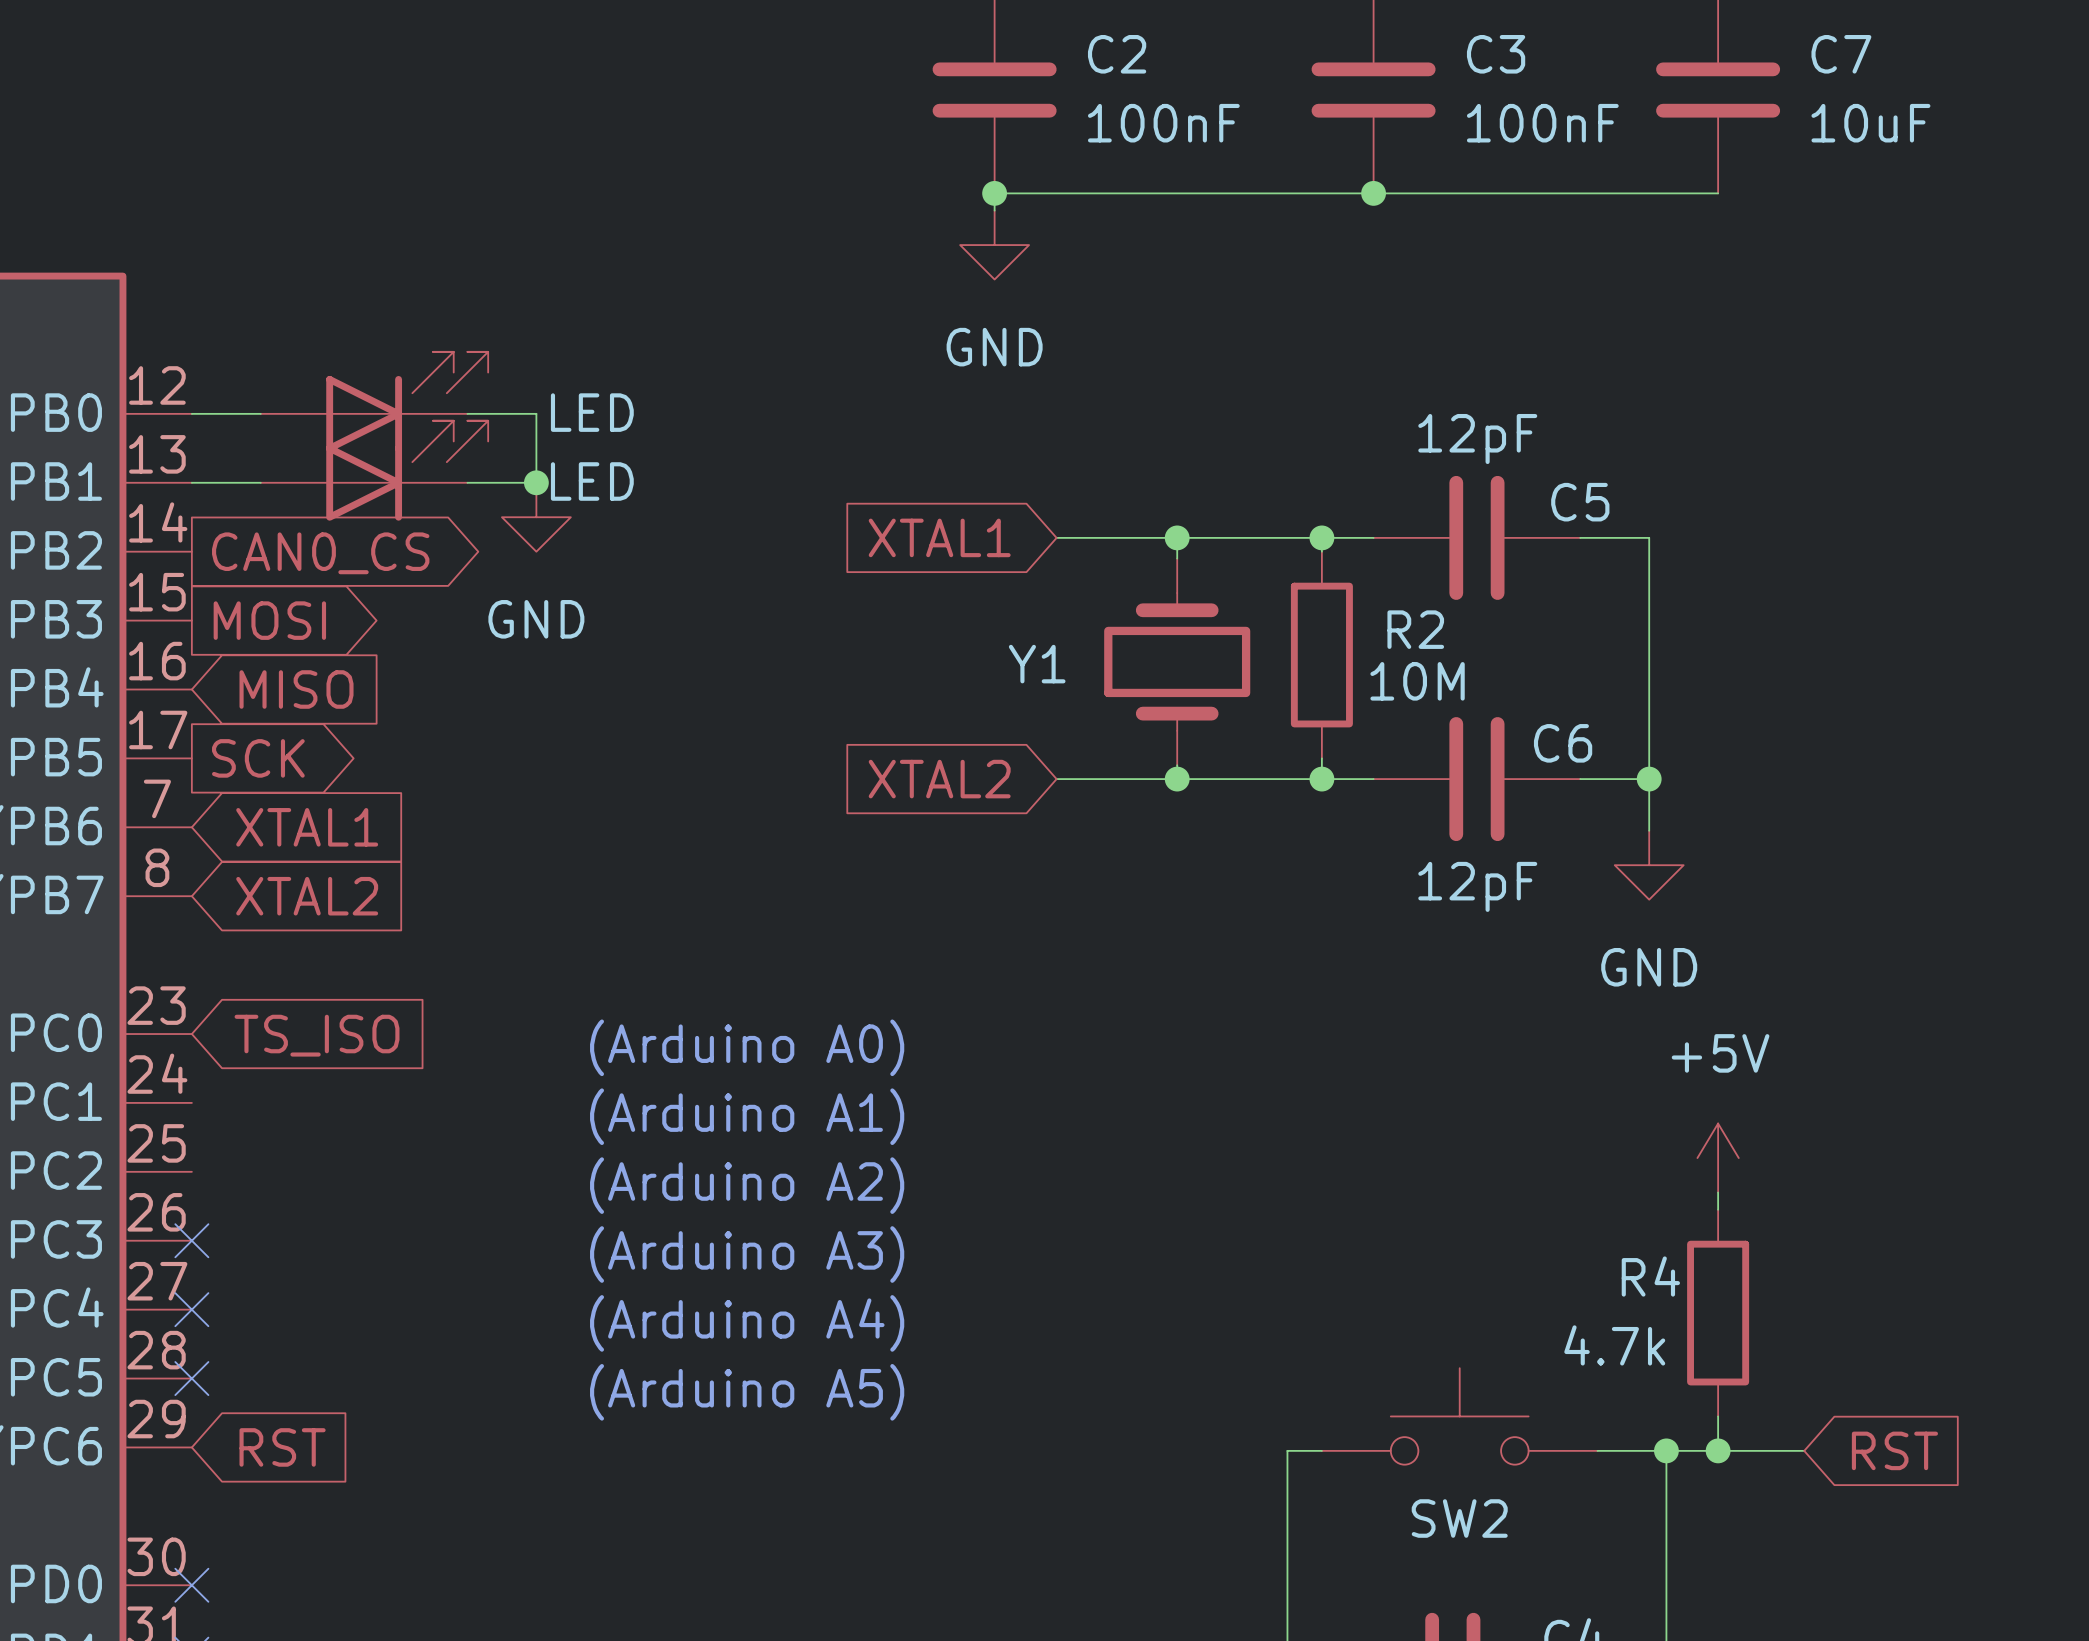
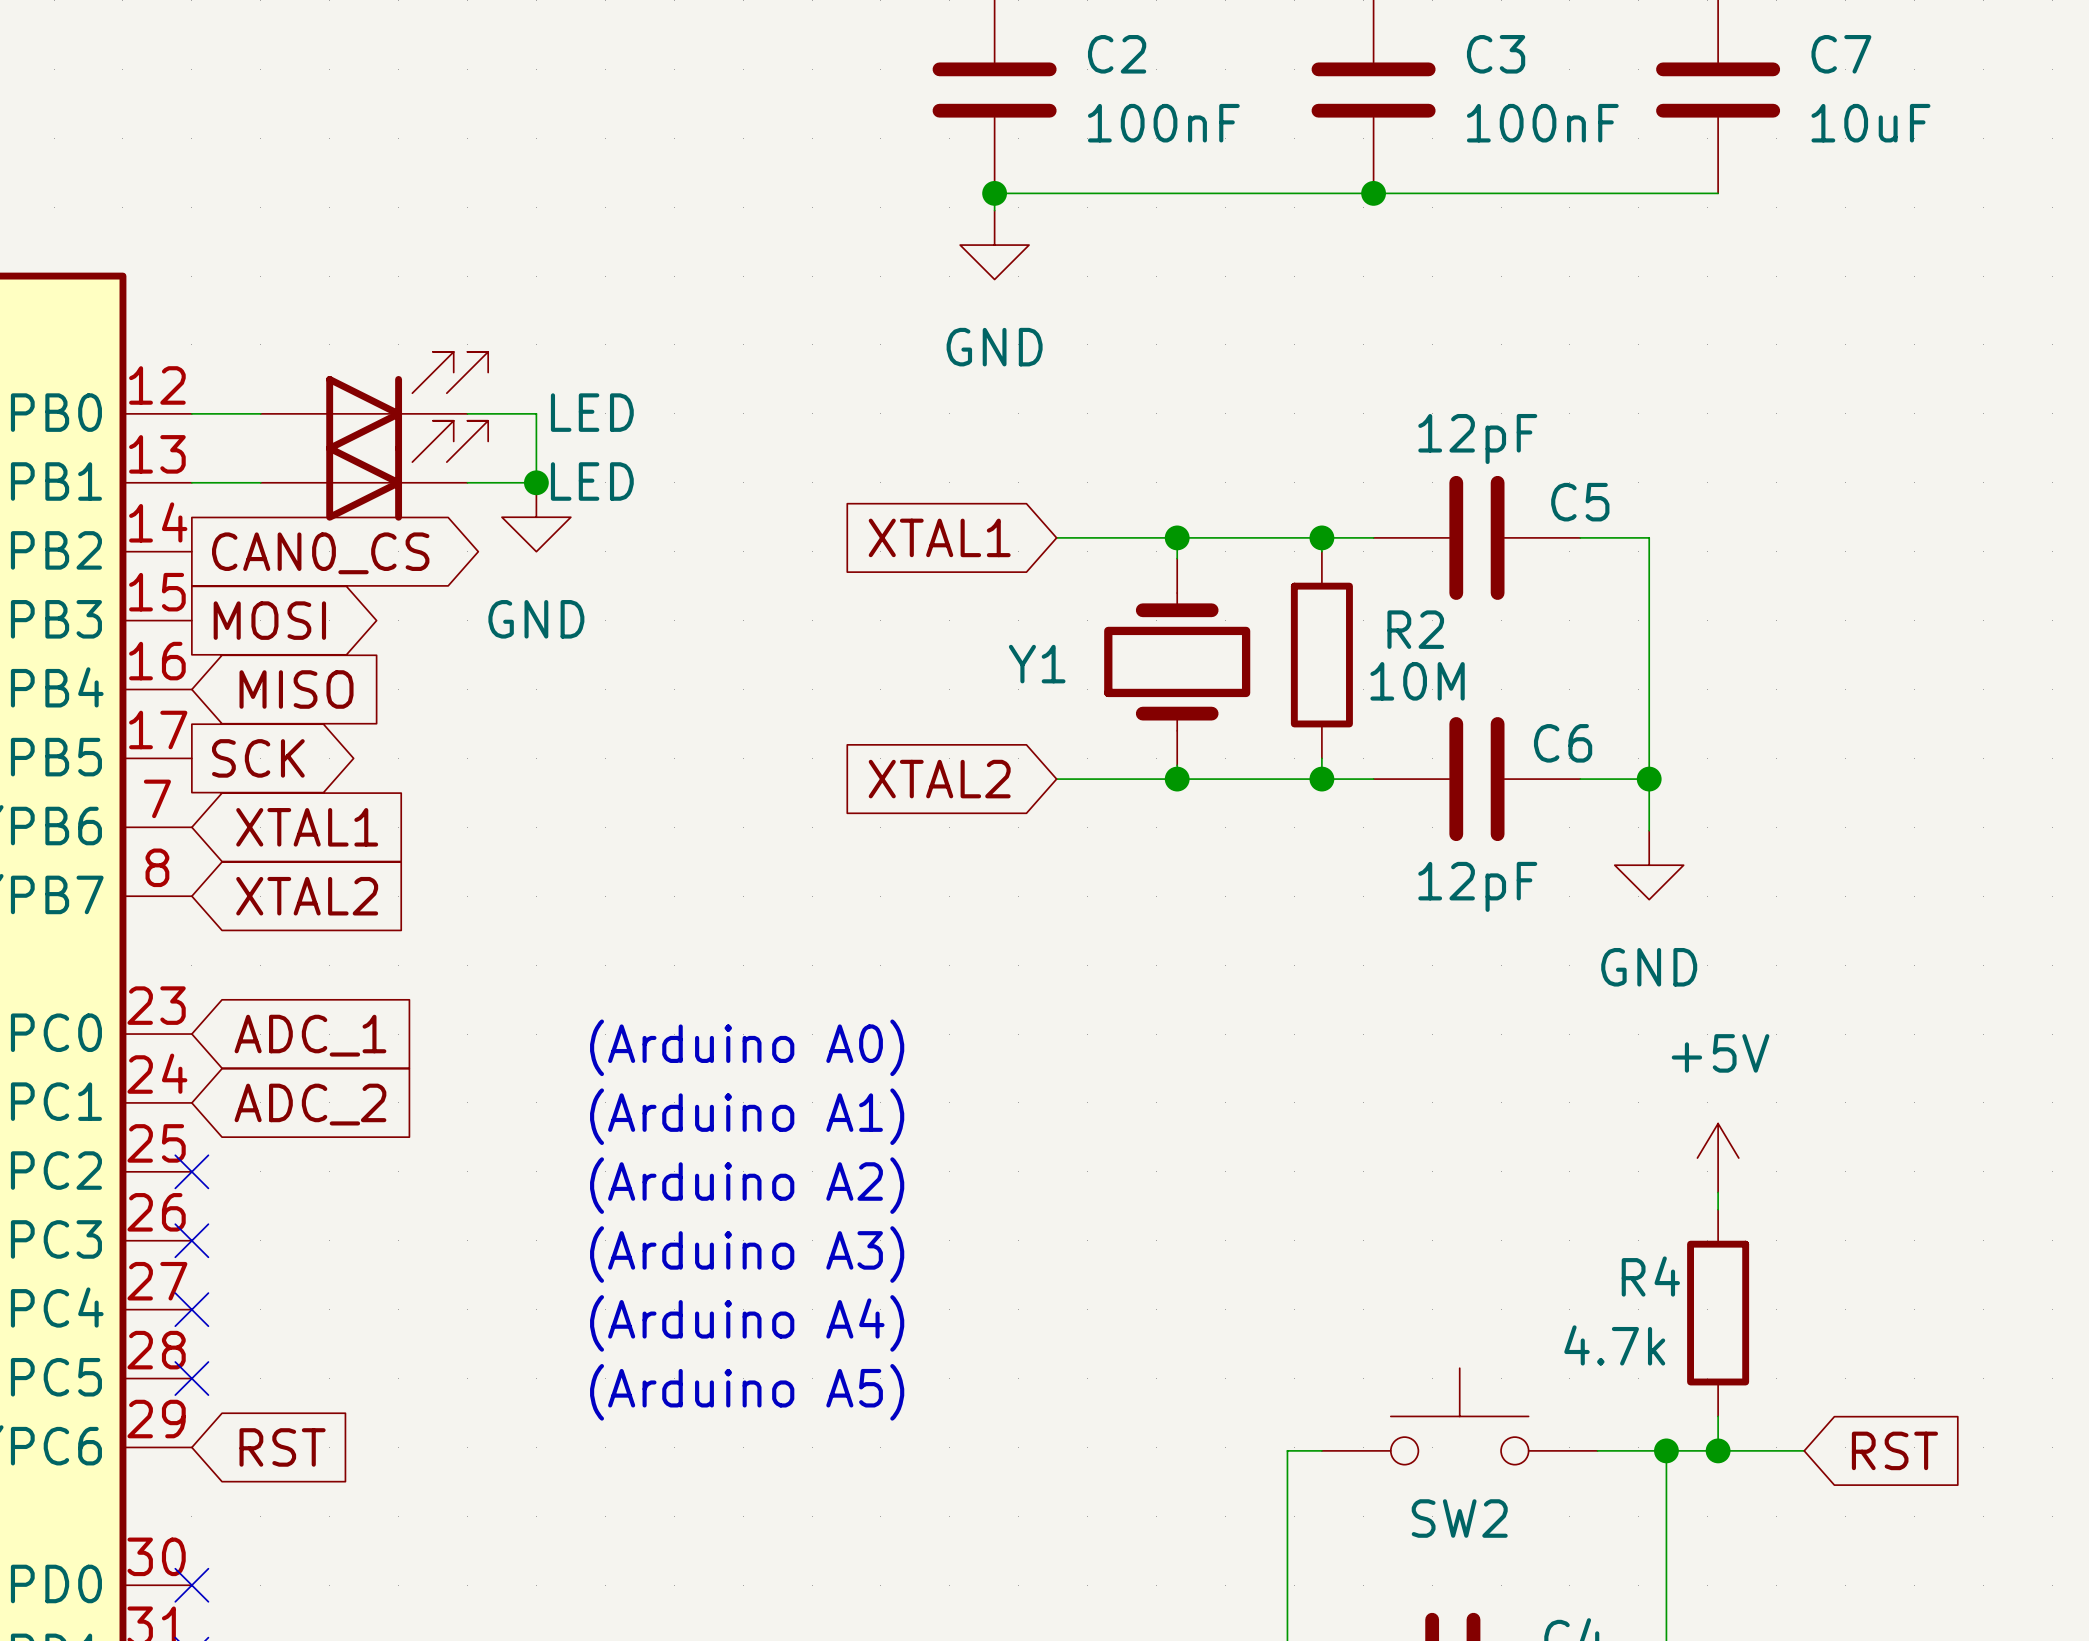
global label: TS_ISO (317, 1035) -> ADC_1 (310, 1035)
global label: none -> ADC_2 (310, 1104)
no-connect mark: none -> (191, 1171)

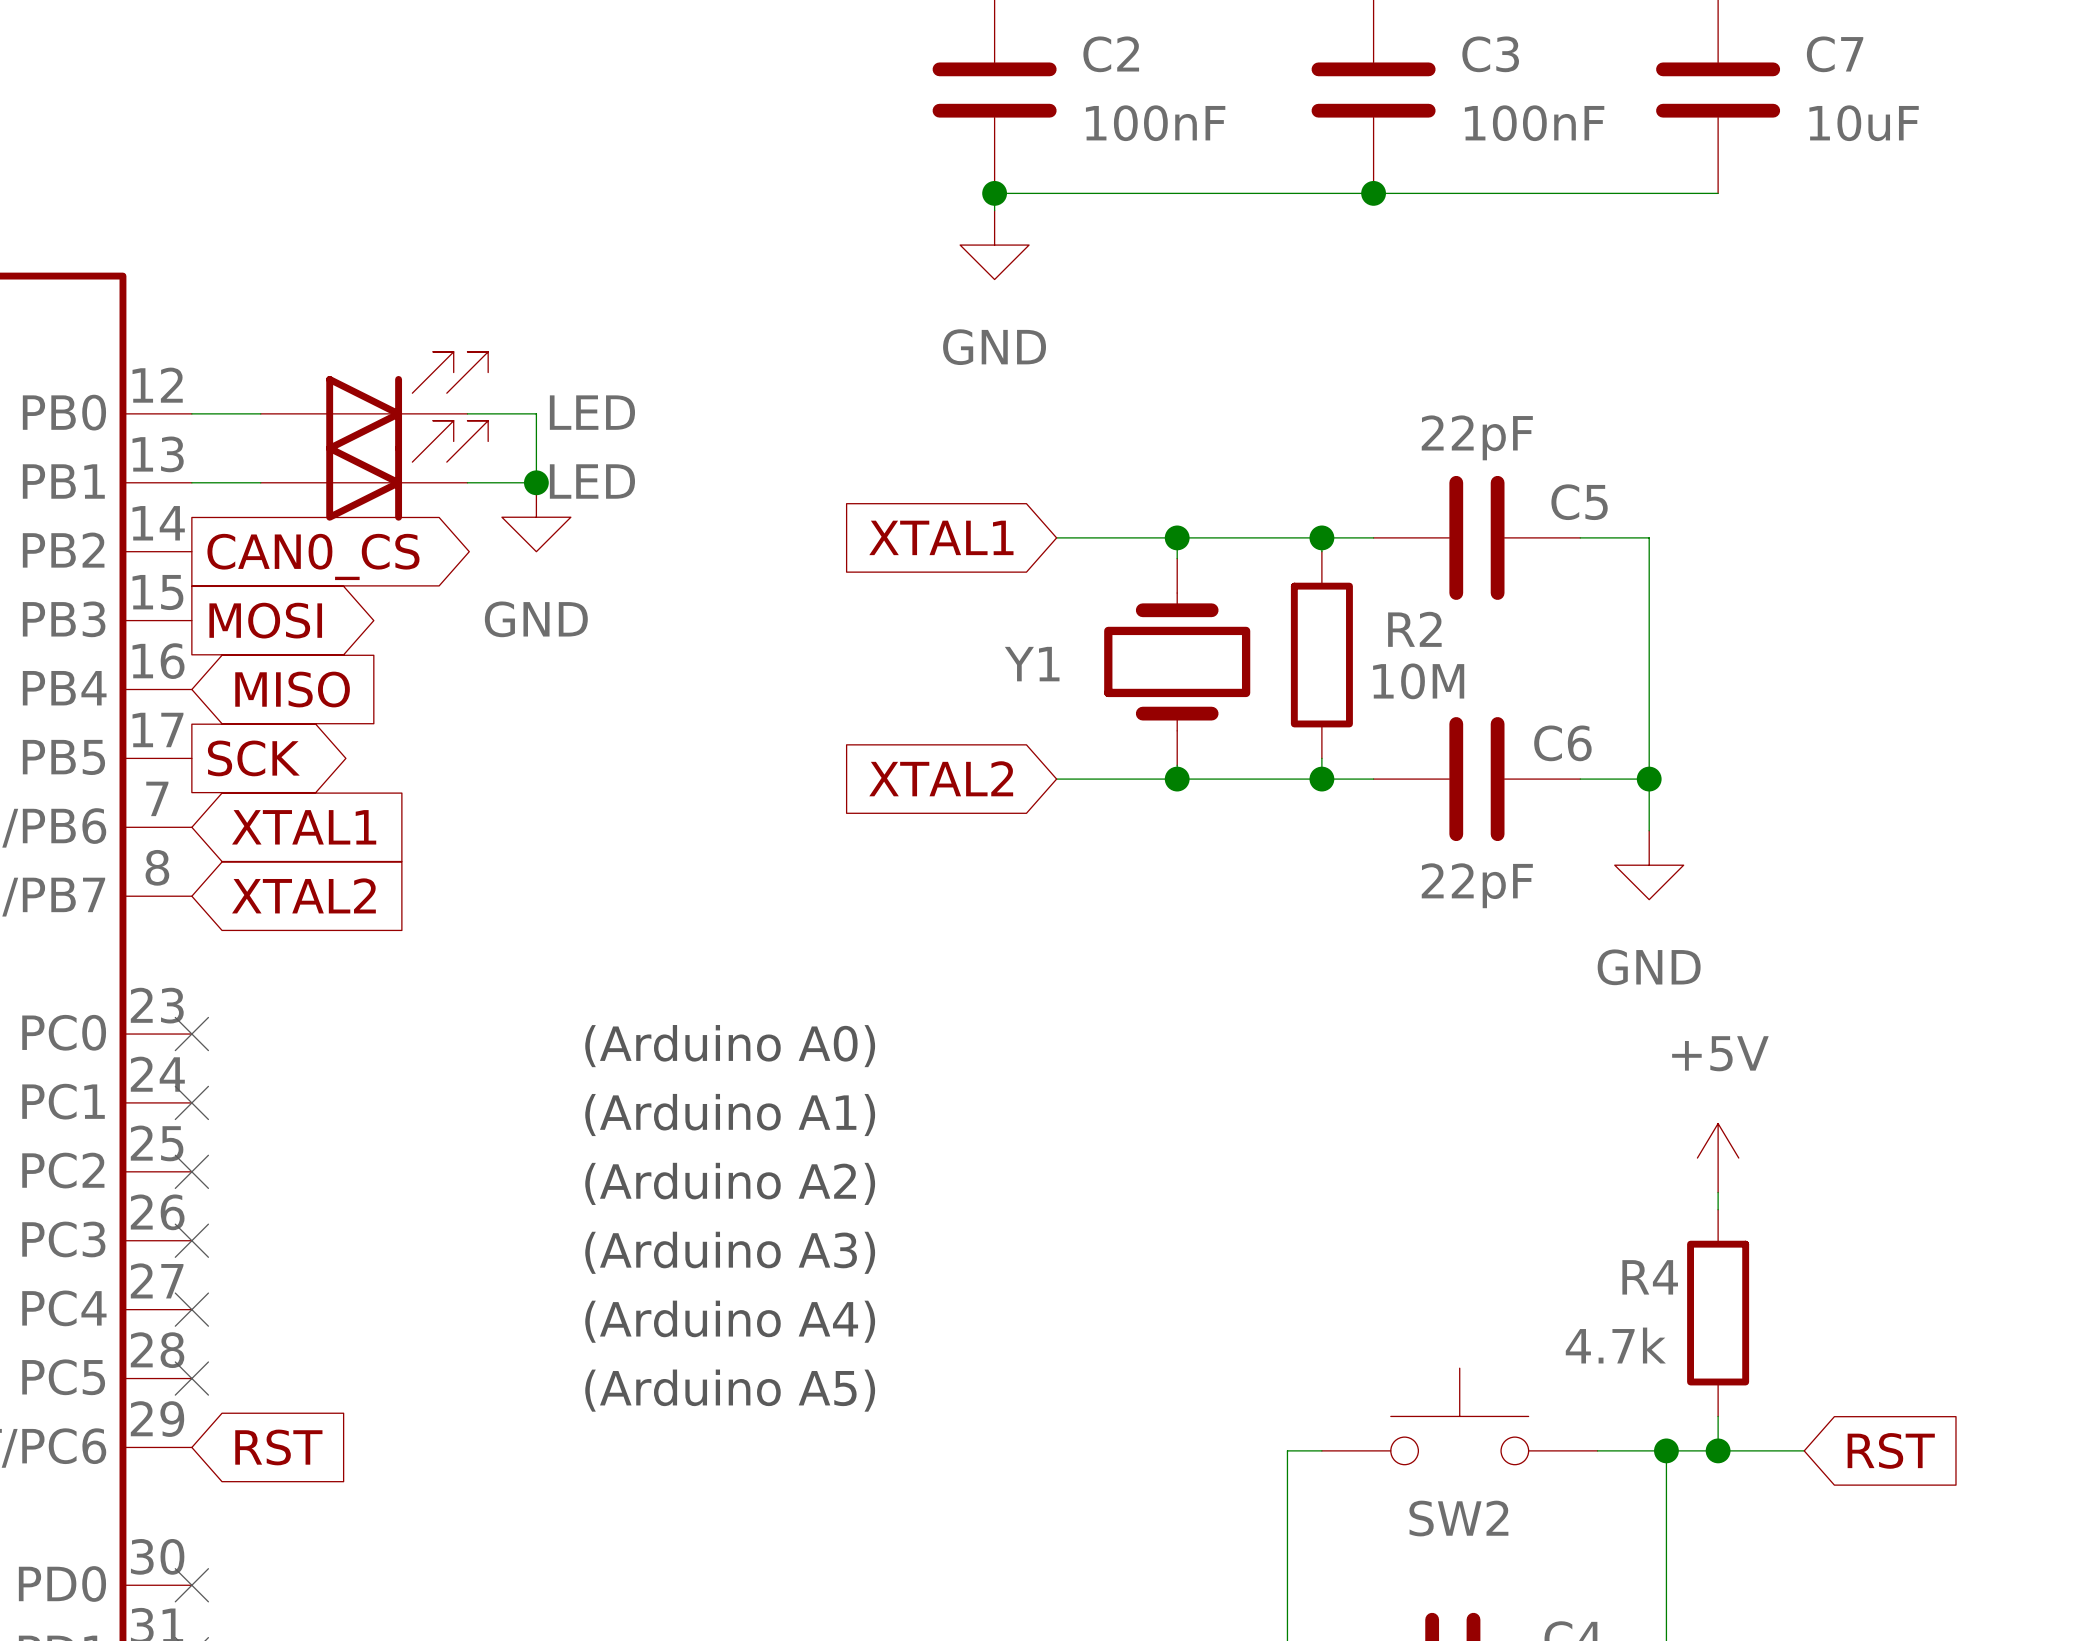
C5 value: 12pF (1477, 439) -> 22pF (1477, 437)
C6 value: 12pF (1477, 886) -> 22pF (1477, 885)
no-connect mark: none -> (191, 1034)
global label: ADC_1 (310, 1035) -> none
no-connect mark: none -> (191, 1102)
global label: ADC_2 (310, 1104) -> none

